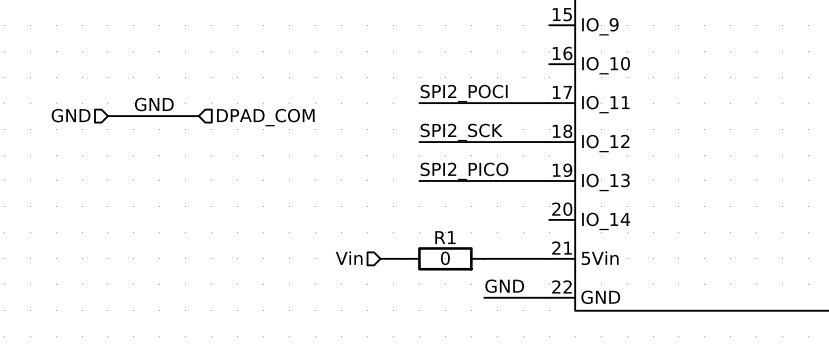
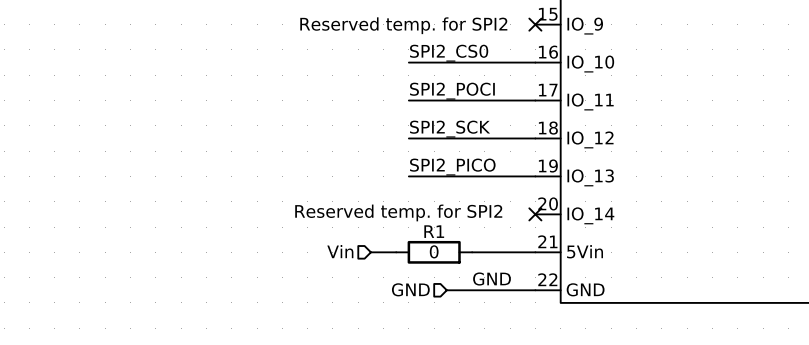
no-connect mark: none -> (535, 24)
text: none -> Reserved temp. for SPI2 (403, 25)
label: none -> SPI2_CS0 (449, 53)
wire: none -> (408, 62) (535, 62)
label: GND (154, 104) -> none
hierarchical label: GND (71, 115) -> none
wire: (107, 116) (198, 116) -> none
hierarchical label: DPAD_COM (265, 117) -> none
text: none -> Reserved temp. for SPI2 (398, 212)
no-connect mark: none -> (535, 214)
hierarchical label: none -> GND (410, 289)
wire: none -> (446, 290) (472, 290)

